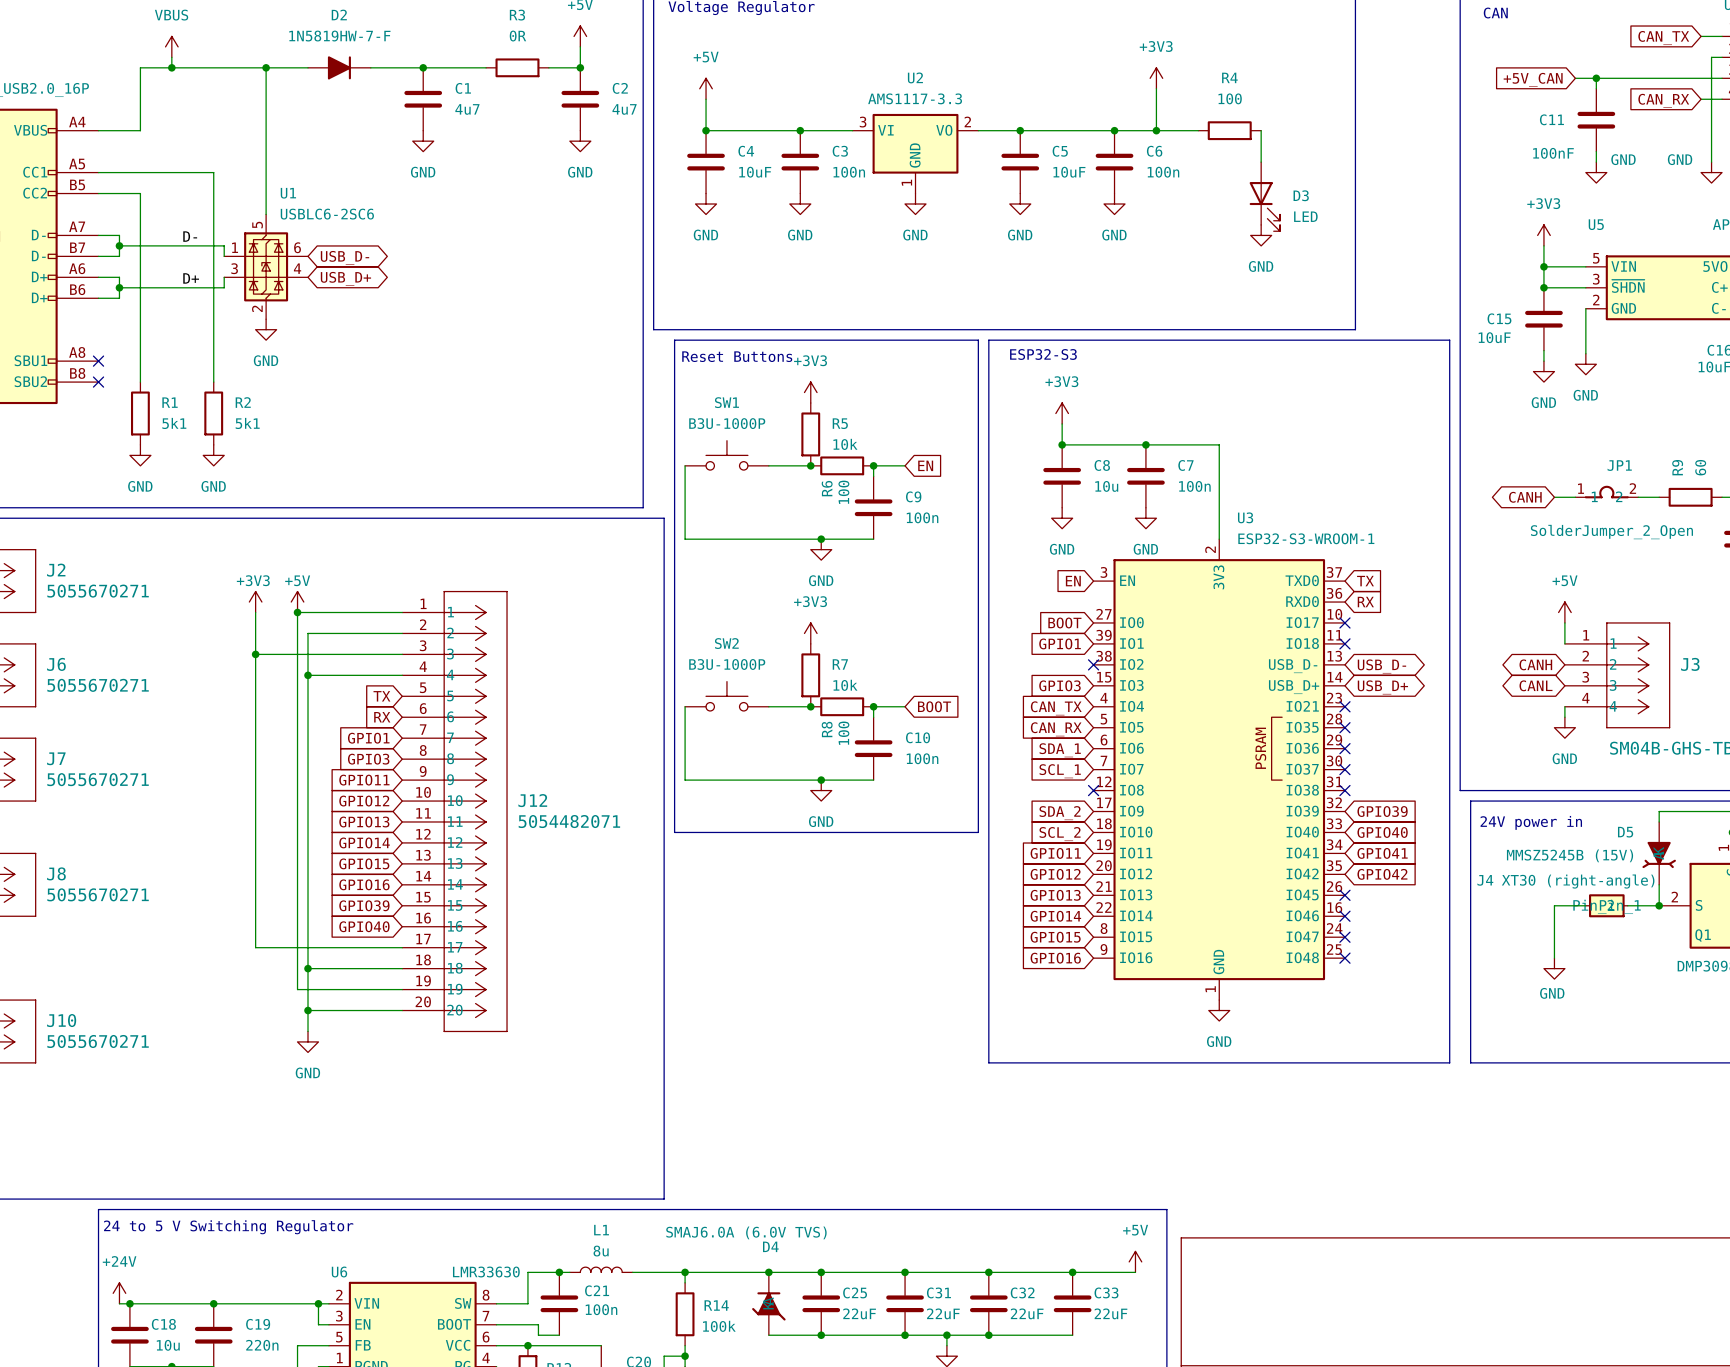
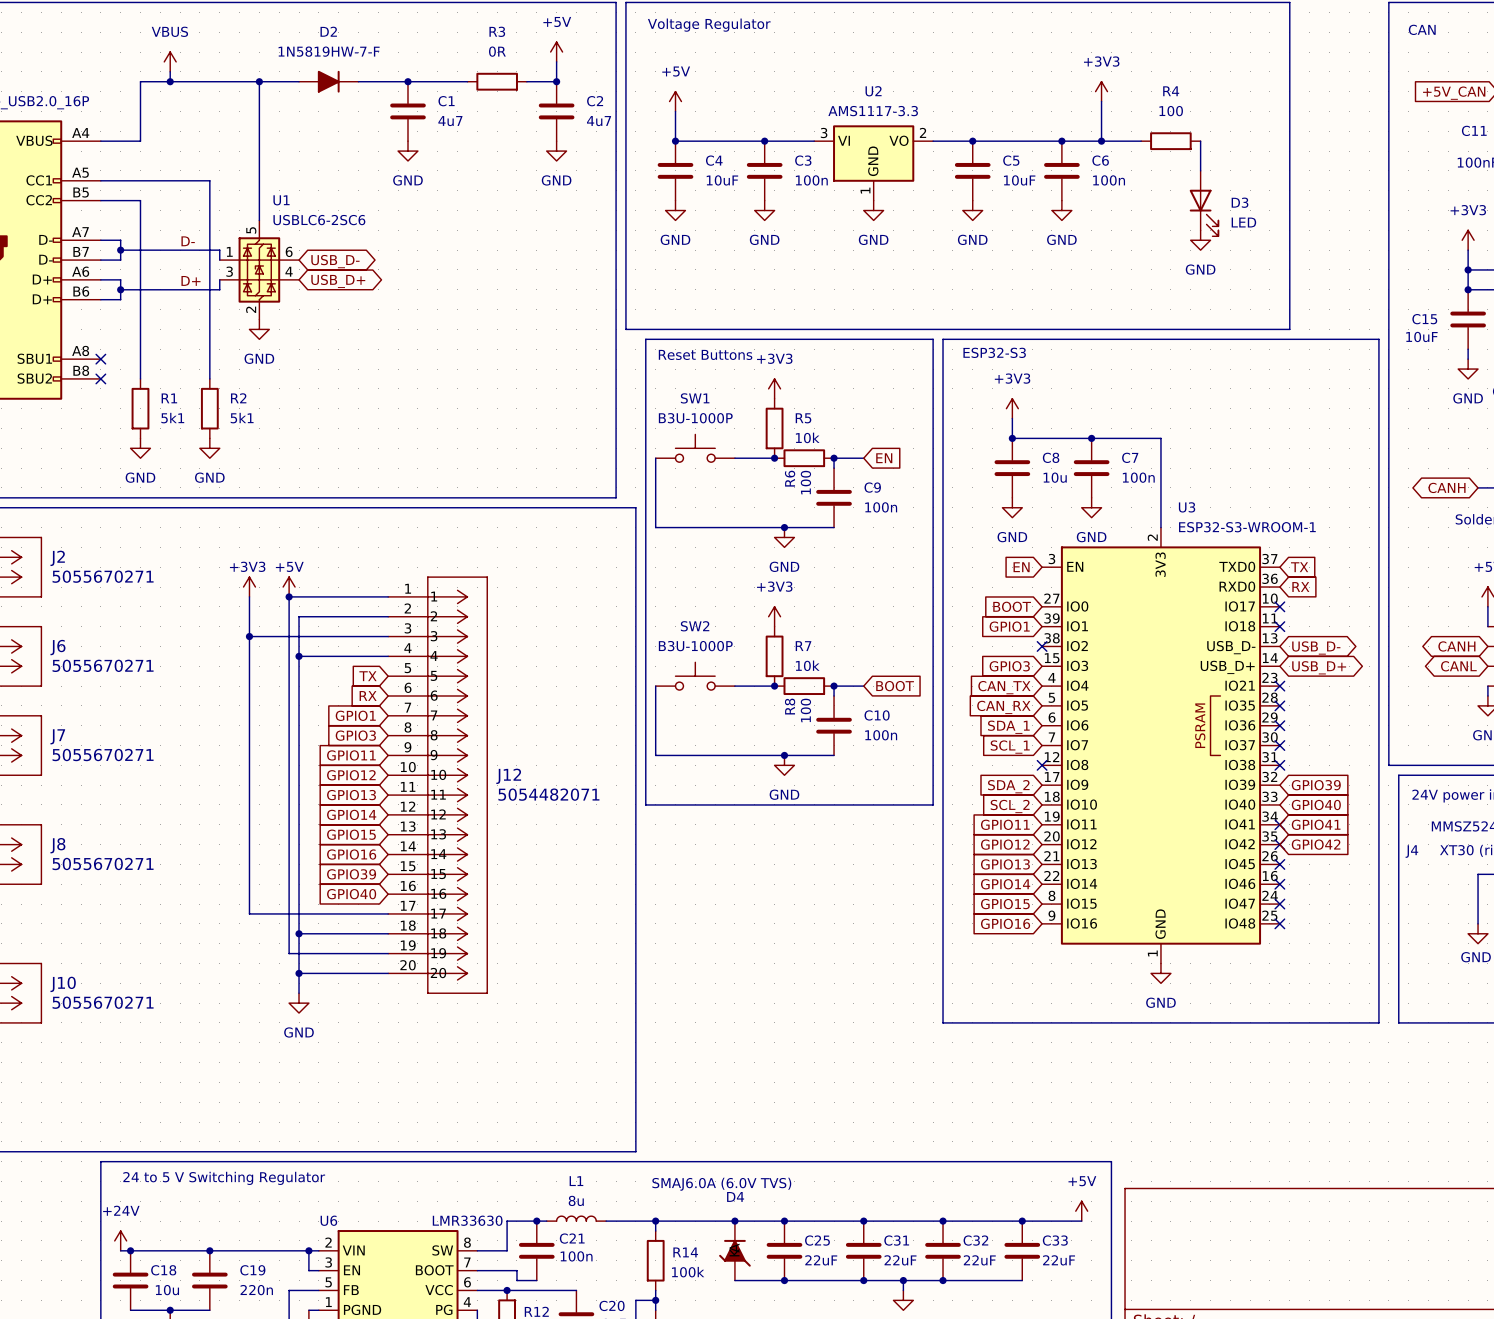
no-connect mark: none -> (1279, 824)
no-connect mark: none -> (1279, 844)

